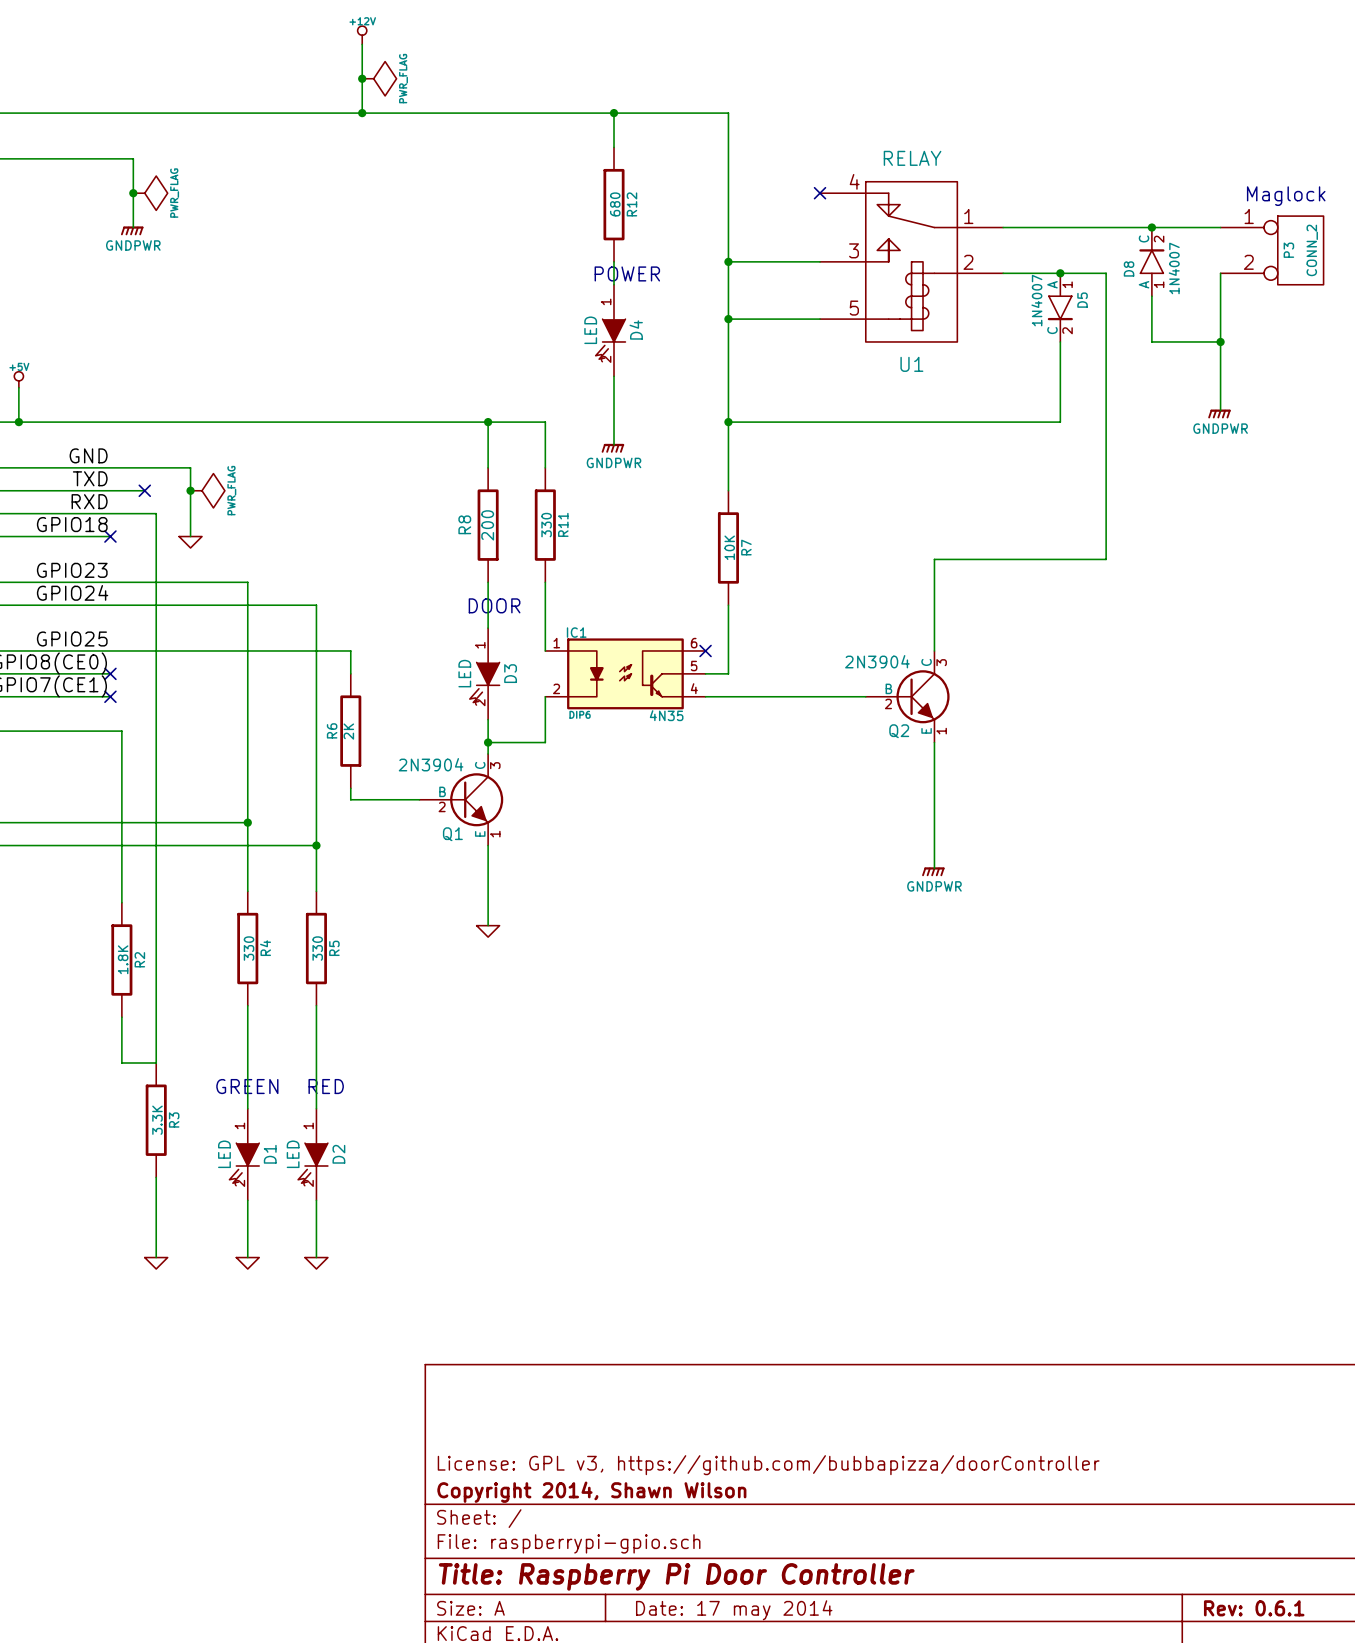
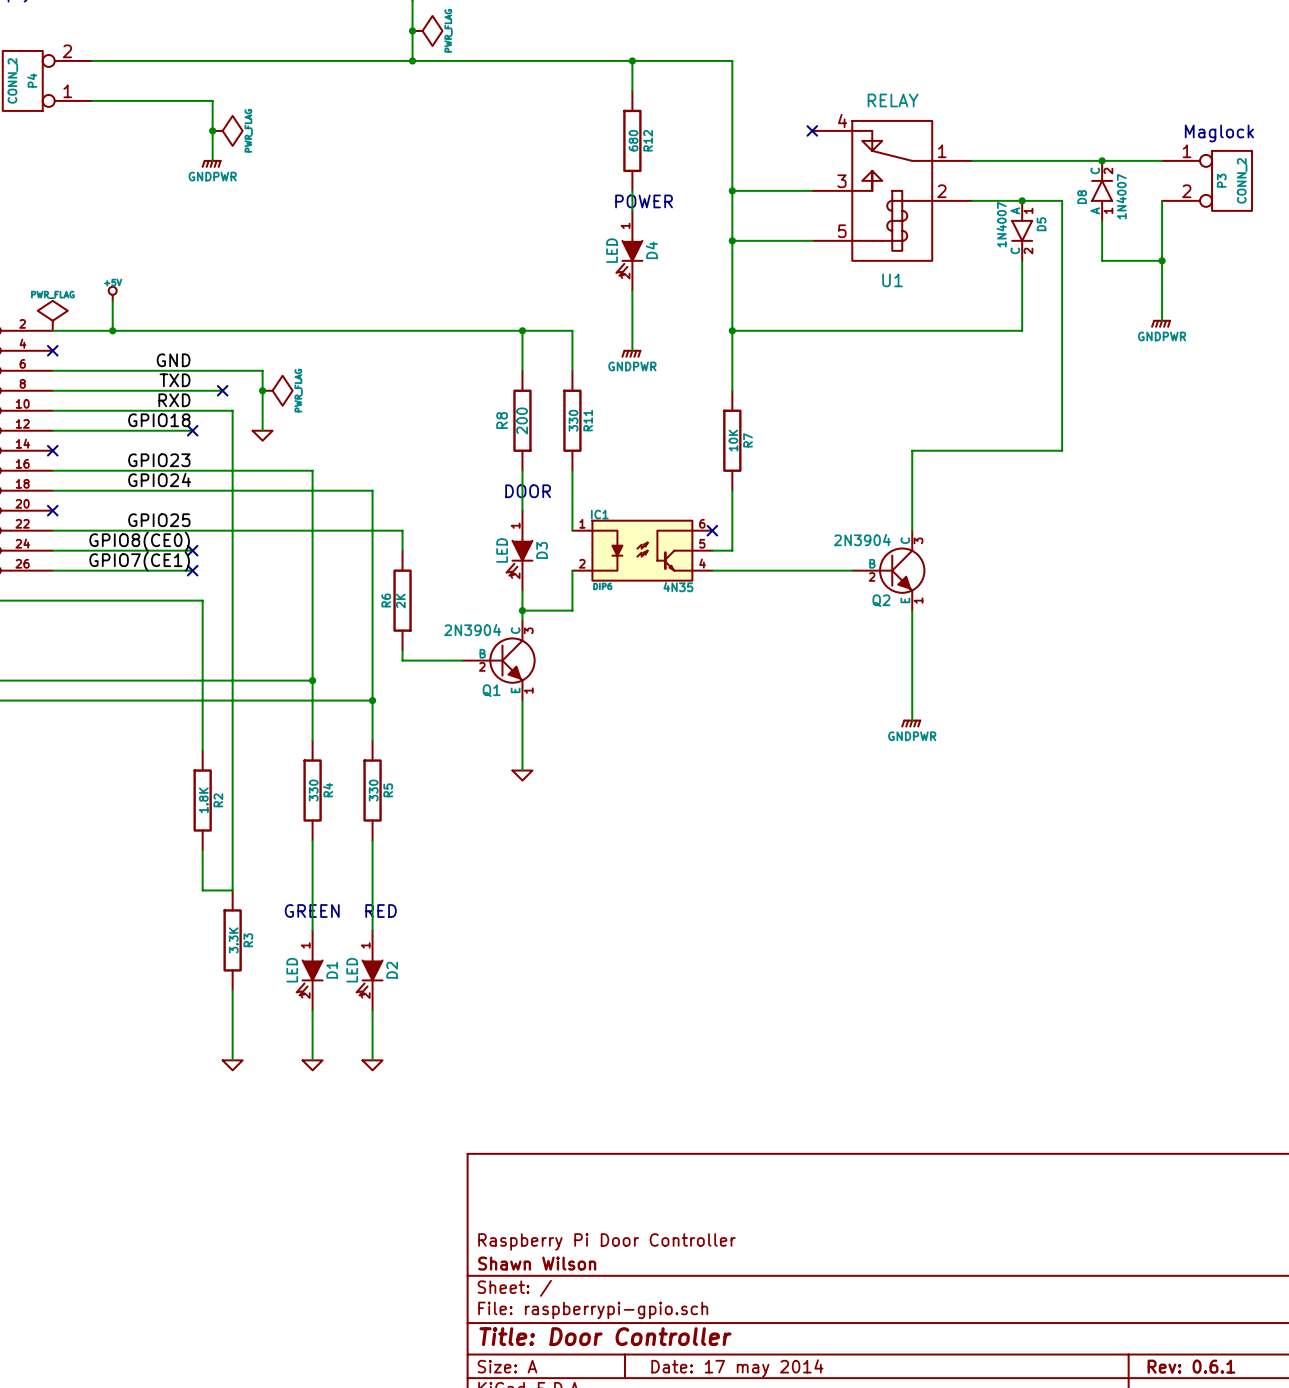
title block: License: GPL v3, https://github.com/bubbapizza/doorController (768, 1465) -> Raspberry Pi Door Controller (606, 1241)
title block: Copyright 2014, Shawn Wilson (591, 1492) -> Shawn Wilson (537, 1263)
title block: Title: Raspberry Pi Door Controller (676, 1576) -> Title: Door Controller (605, 1336)

